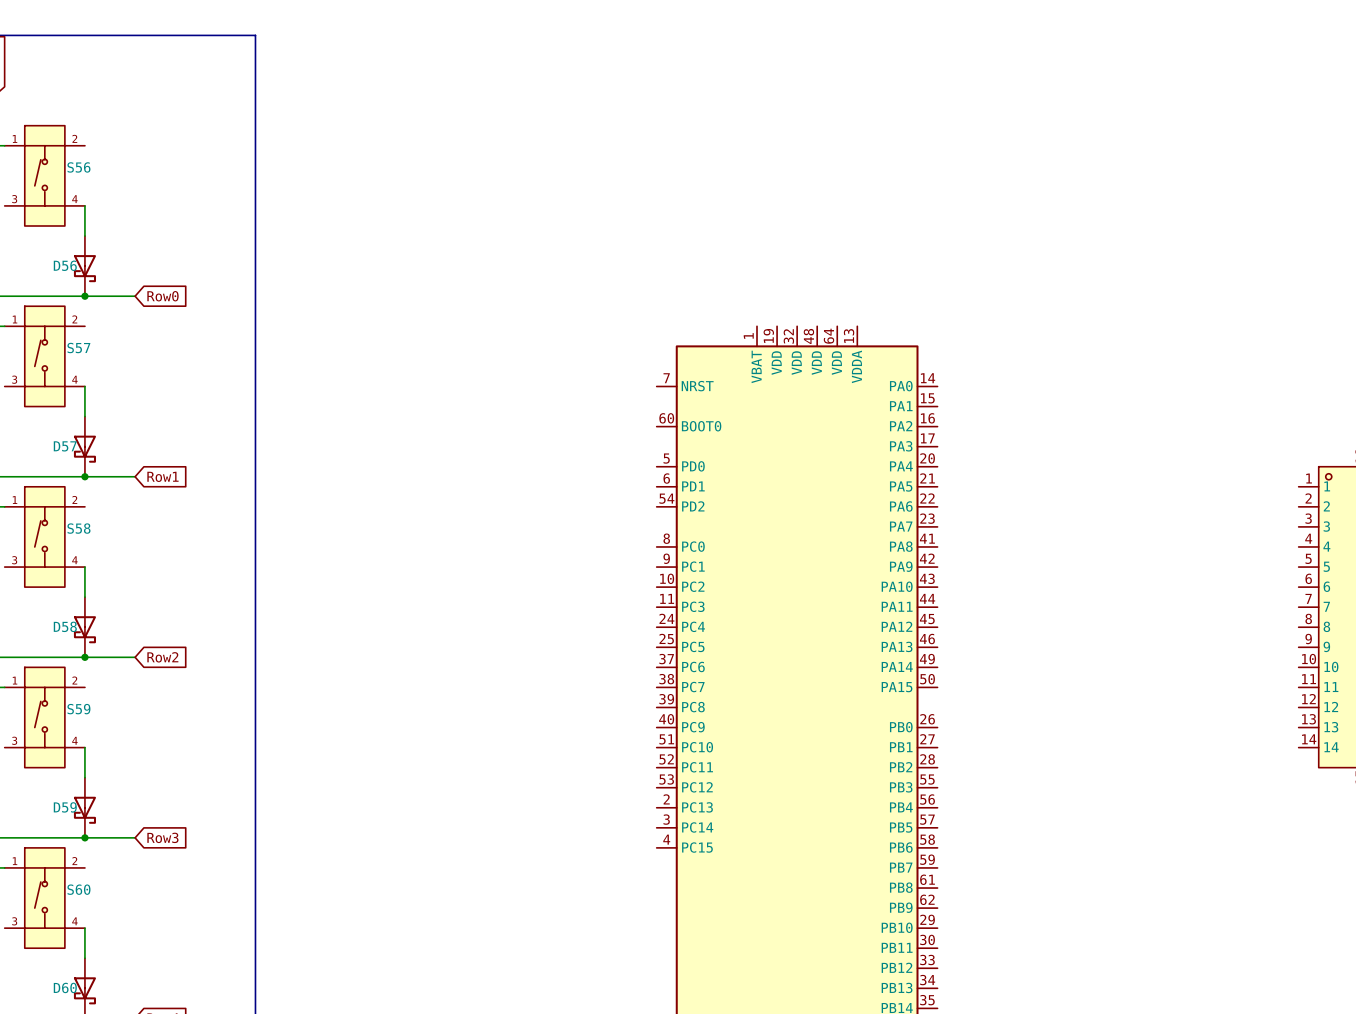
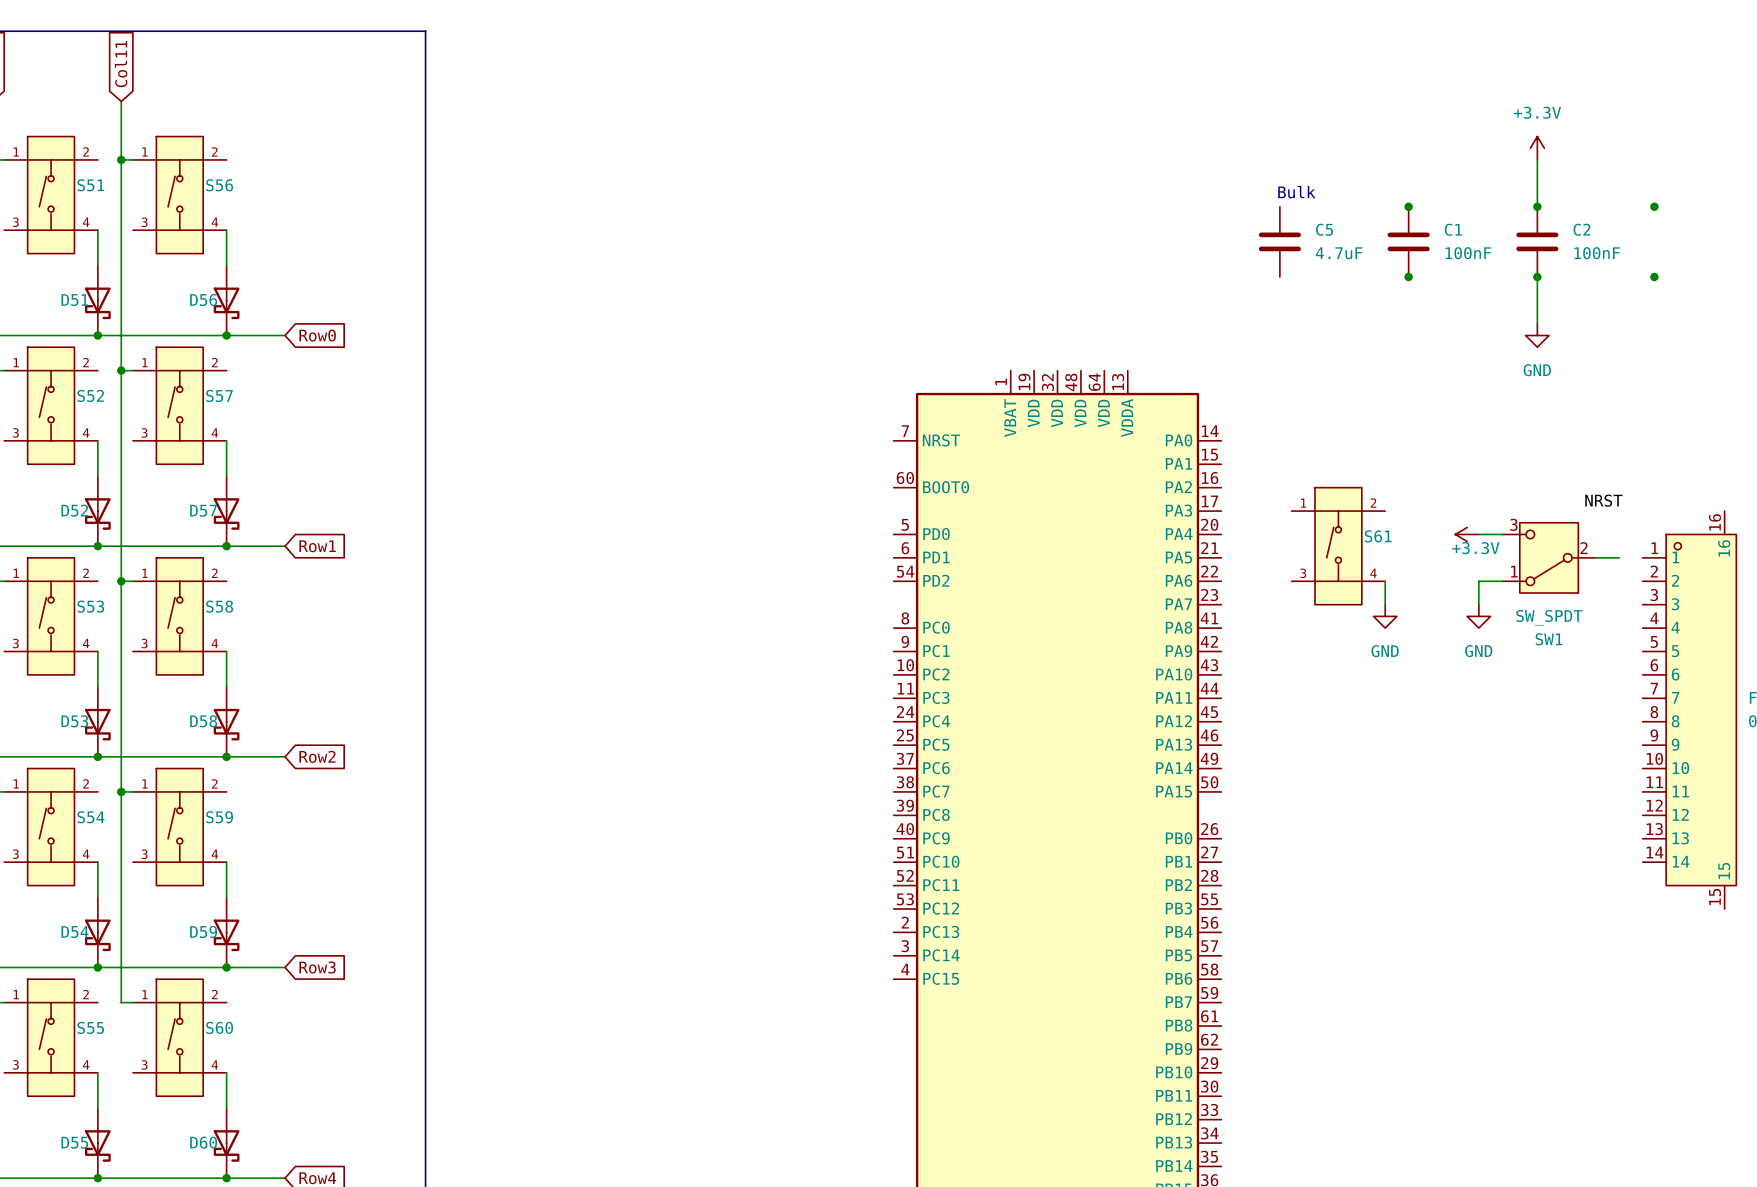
power symbol: none -> +3.3V (1537, 148)
wire: none -> (1537, 159) (1537, 206)
text: none -> Bulk (1296, 192)
junction: none -> (1408, 206)
junction: none -> (1537, 206)
junction: none -> (1654, 206)
C5: none -> 4.7uF (1279, 241)
C1: none -> 100nF (1408, 241)
C2: none -> 100nF (1537, 241)
junction: none -> (1408, 277)
wire: none -> (1537, 277) (1537, 323)
junction: none -> (1537, 277)
junction: none -> (1654, 277)
power symbol: none -> GND (1537, 335)
label: none -> NRST (1603, 500)
power symbol: none -> +3.3V (1467, 534)
wire: none -> (1478, 534) (1502, 534)
S61: none -> (1338, 546)
SW1: none -> SW_SPDT (1549, 557)
wire: none -> (1595, 557) (1619, 557)
wire: none -> (1385, 581) (1385, 604)
wire: none -> (1502, 581) (1478, 581) (1478, 604)
power symbol: none -> GND (1385, 616)
power symbol: none -> GND (1478, 616)

